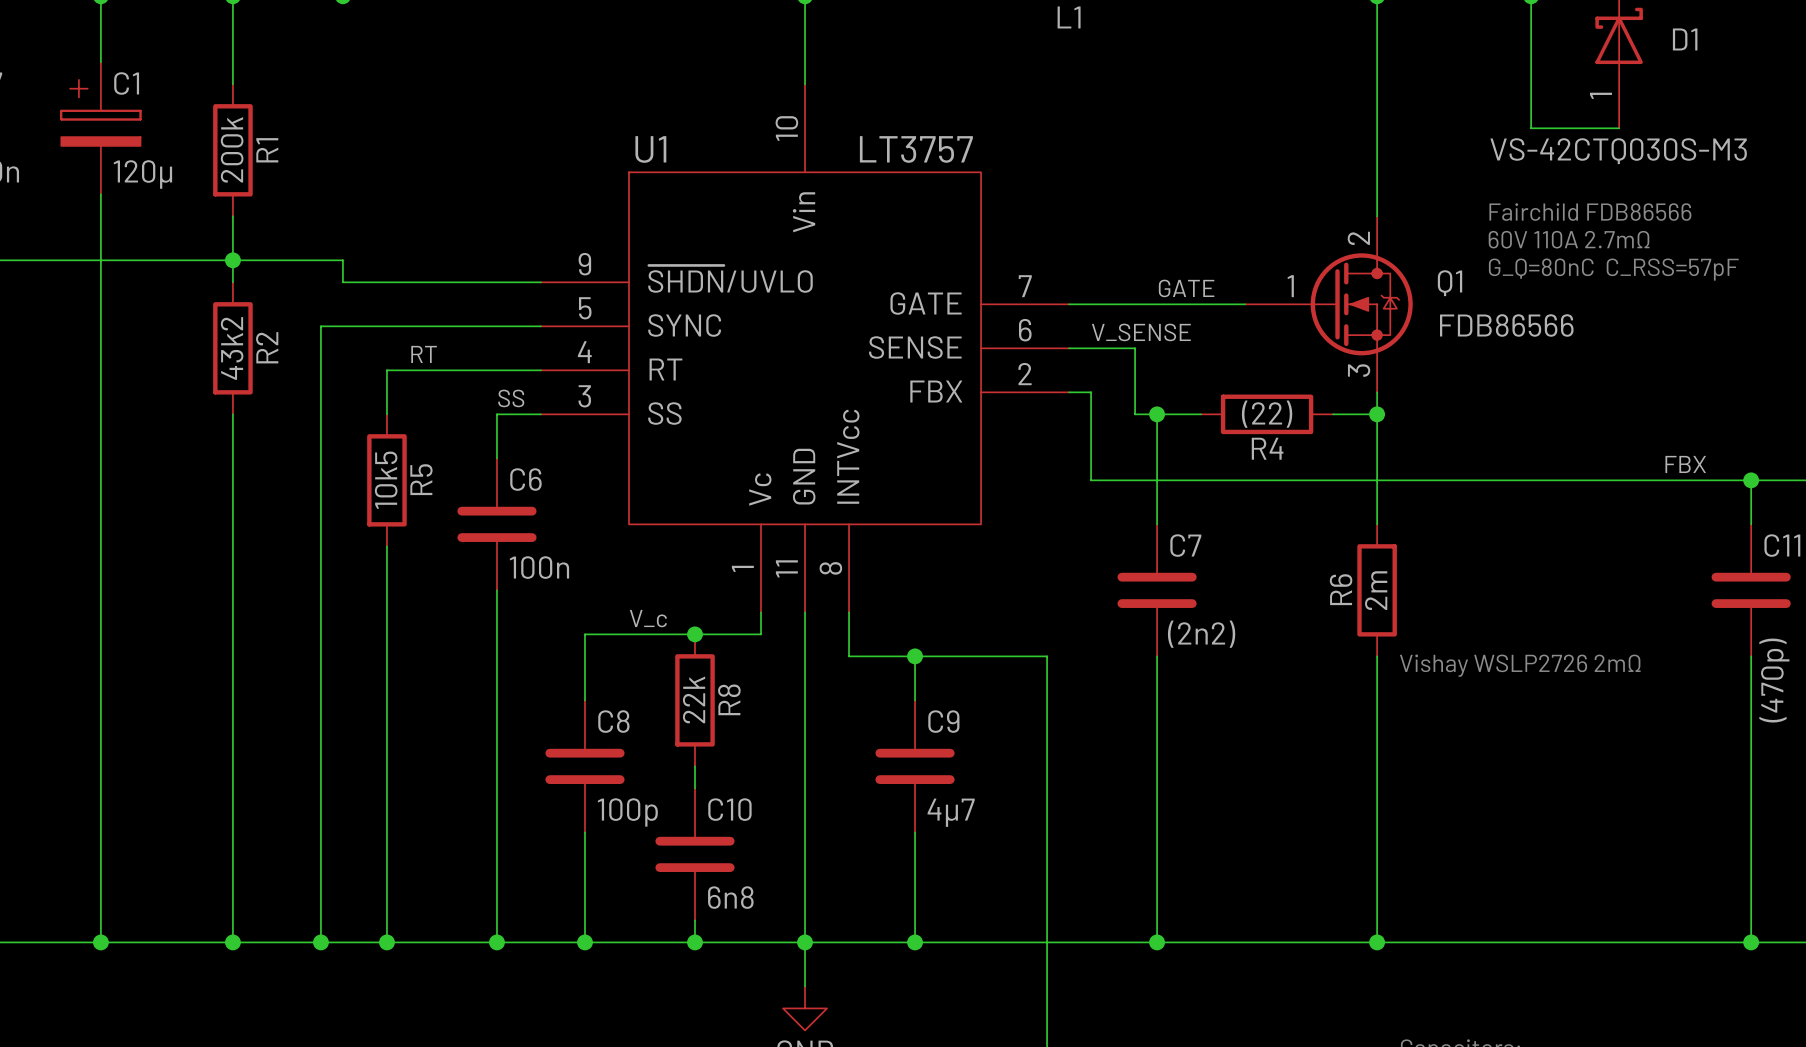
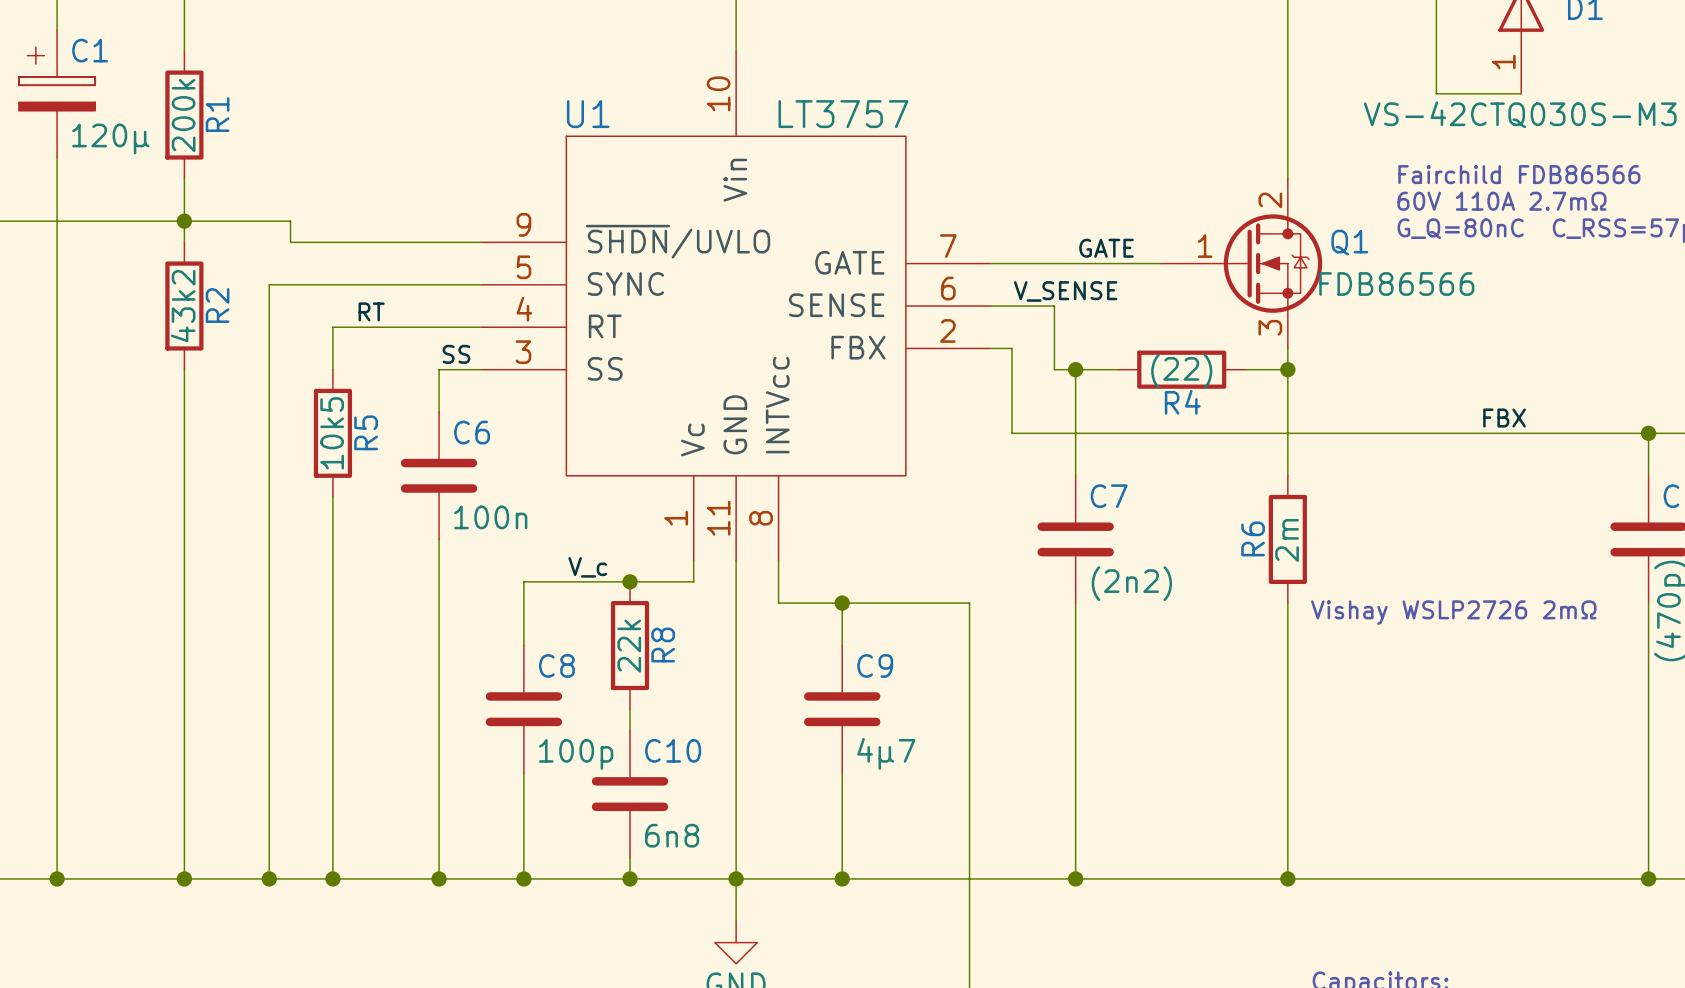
label position: FBX (1685, 464) -> FBX (1504, 418)

